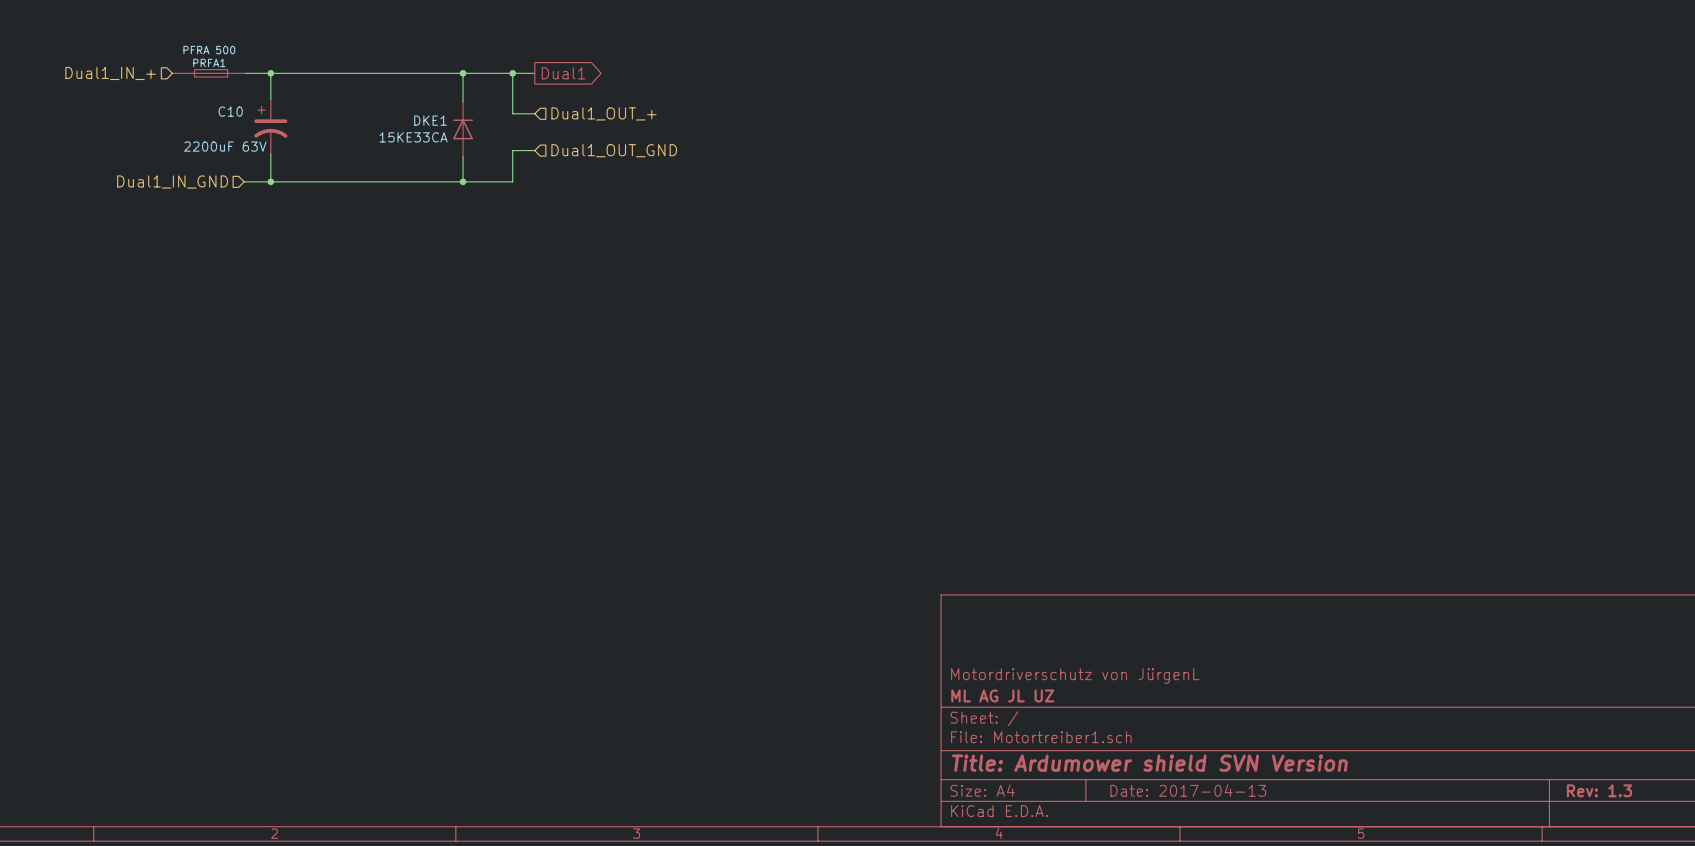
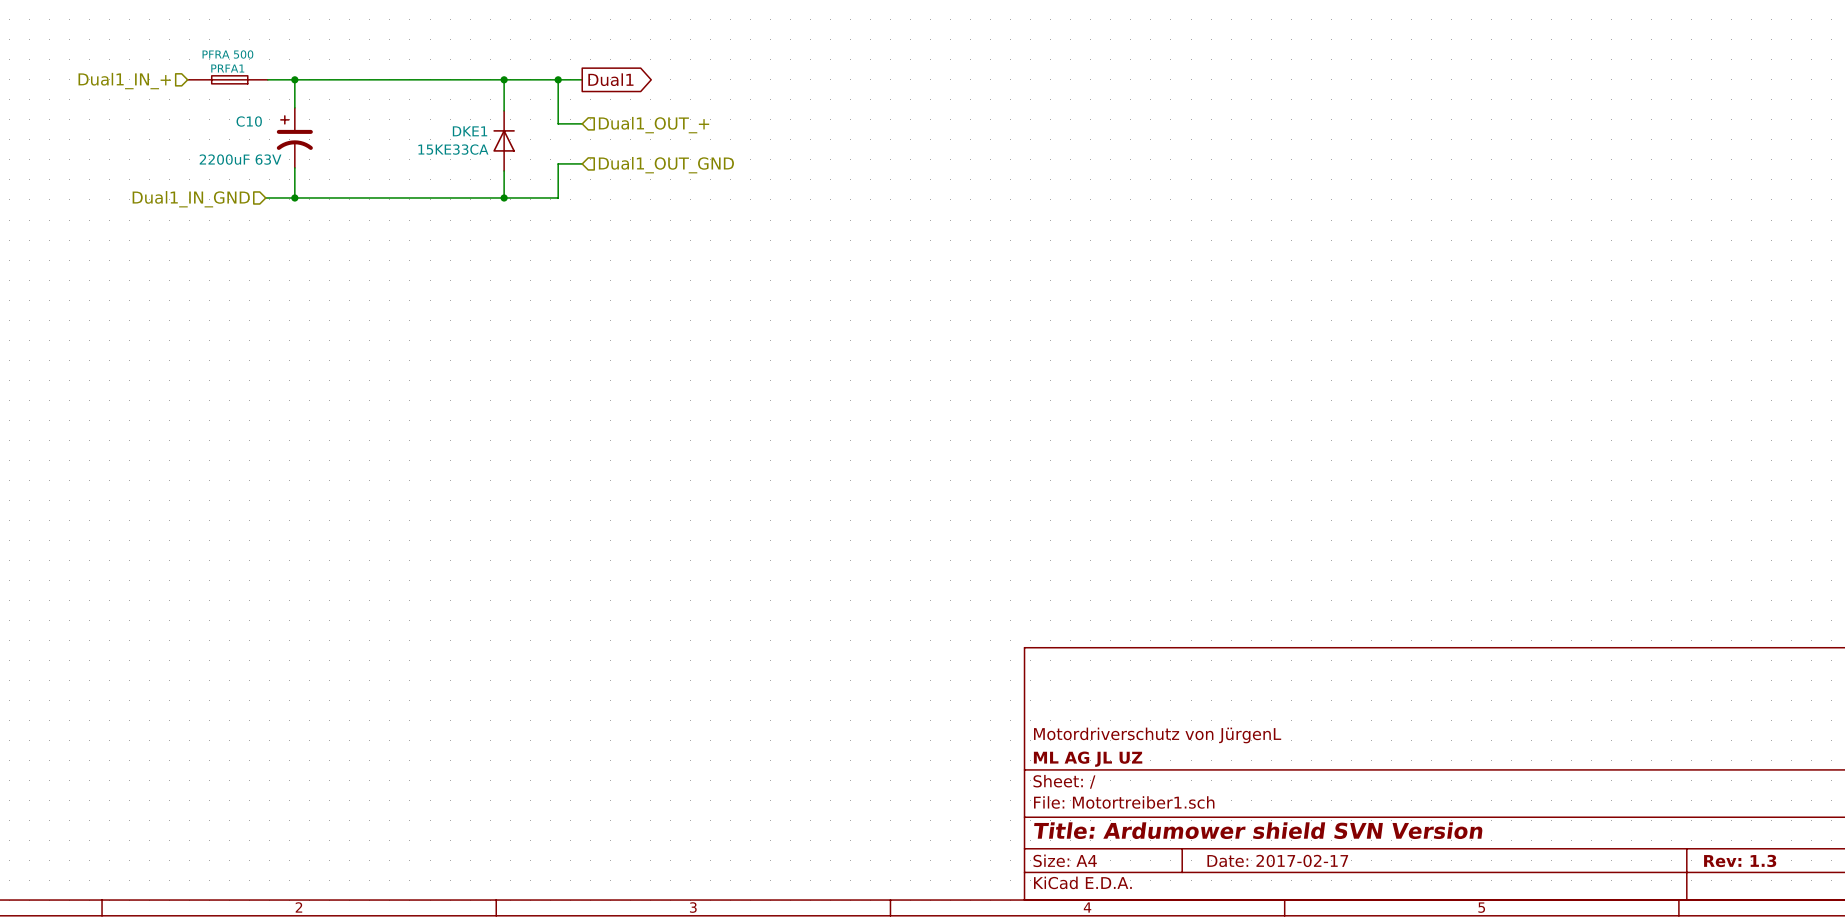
title block: Date: 2017-04-13 (1188, 790) -> Date: 2017-02-17 (1277, 860)

